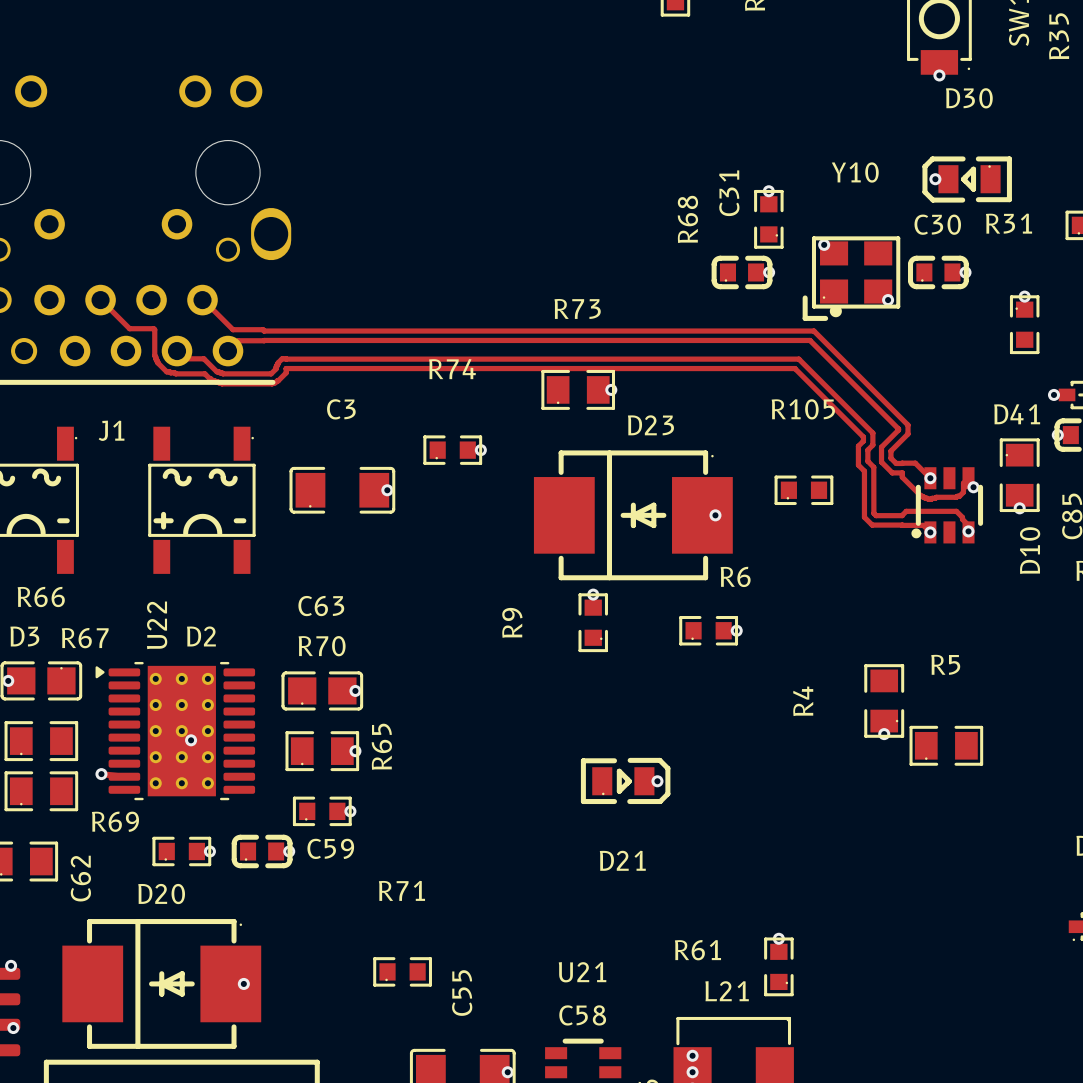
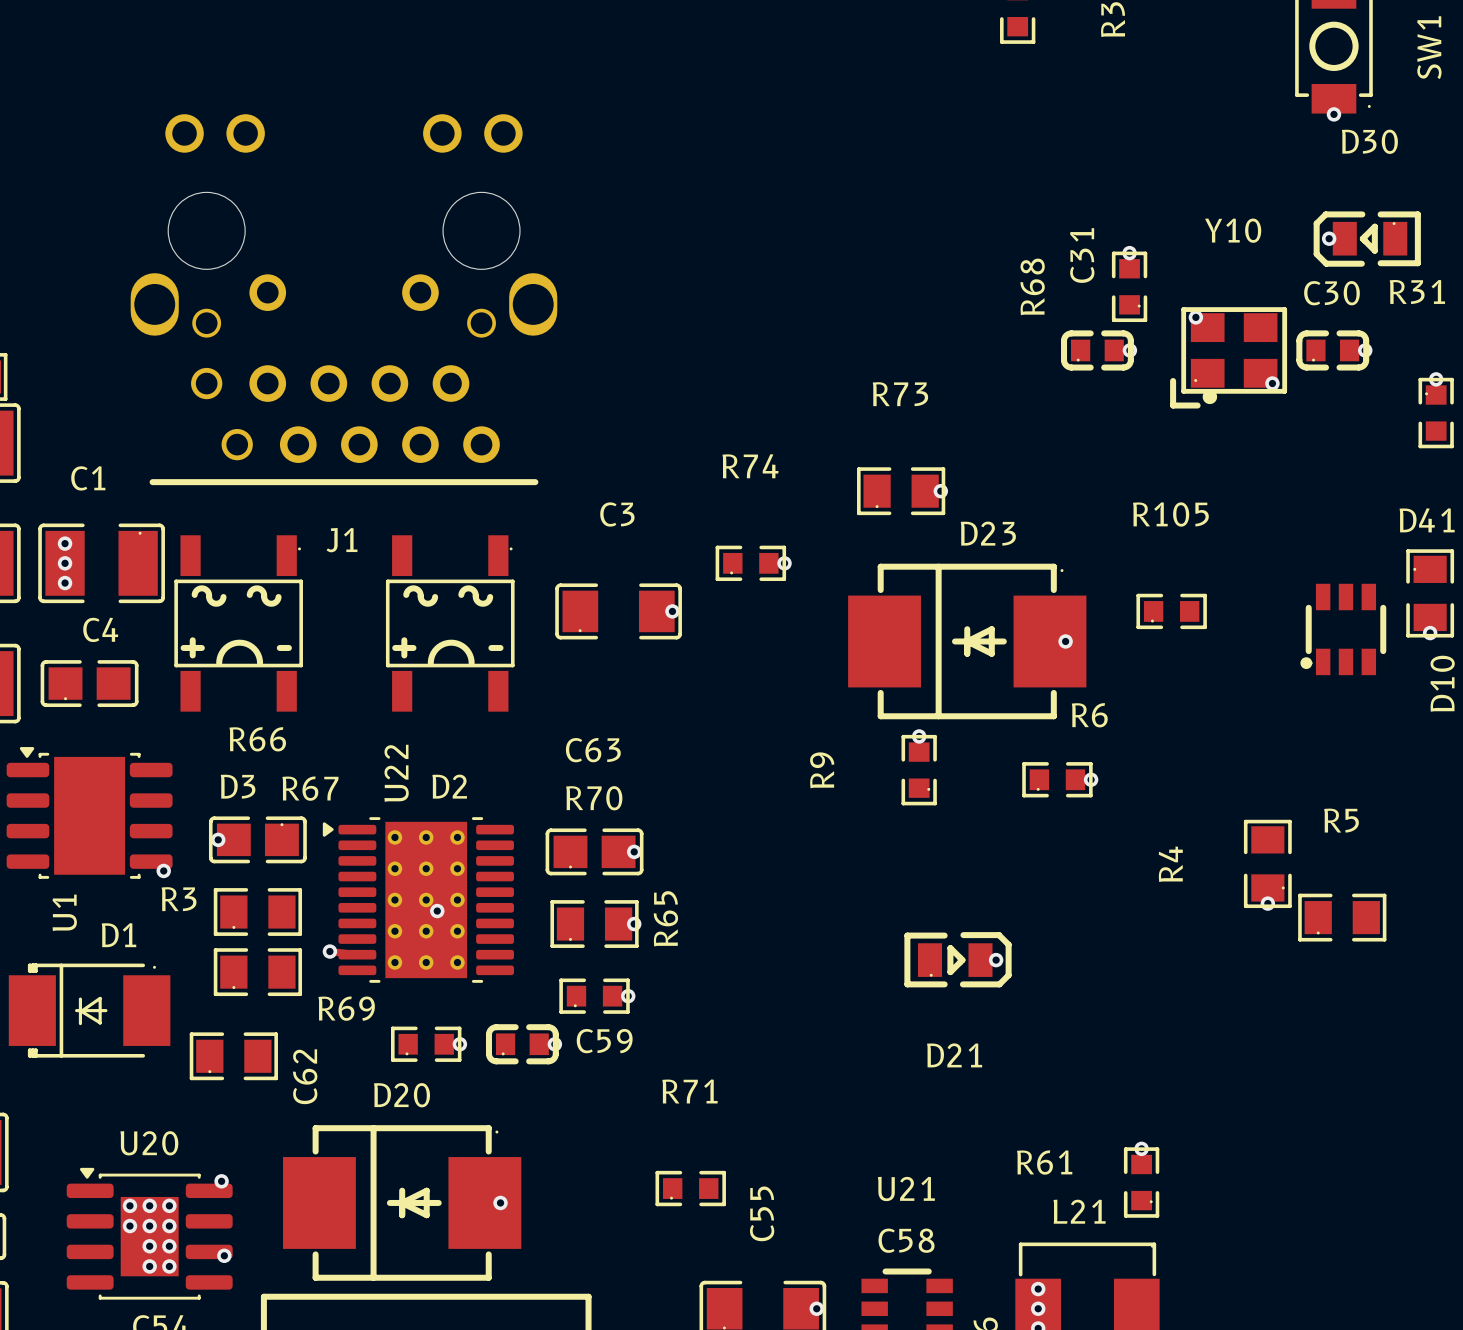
track: (100, 299) (129, 328) (154, 329) (154, 355) (157, 362) (166, 371) (175, 373) (204, 373) (212, 380) (221, 383) (272, 383) (286, 372) (286, 368) (794, 368) (863, 437) (863, 441) (858, 446) (858, 465) (864, 471) (864, 517) (872, 525) (902, 525) -> none
track: (202, 299) (233, 329) (264, 330) -> none
track: (264, 331) (813, 331) (908, 425) (908, 434) (890, 451) (890, 458) (896, 463) (902, 463) -> none
track: (264, 340) (810, 340) (898, 429) (881, 447) (881, 462) (892, 472) (902, 472) (902, 477) (921, 496) (928, 499) (959, 496) (963, 492) (963, 483) (968, 478) (968, 482) (973, 487) (970, 487) -> none
track: (264, 340) (238, 340) (227, 350) -> none
track: (176, 350) (184, 358) (203, 358) (216, 371) (222, 373) (271, 373) (276, 368) (278, 362) (282, 358) (286, 358) -> none
track: (286, 359) (798, 359) (872, 433) (872, 445) (867, 450) (867, 461) (873, 467) (873, 513) (876, 515) (902, 515) -> none
track: (902, 463) (915, 463) (930, 478) -> none
via: (930, 478) -> none
via: (973, 487) -> none
track: (902, 515) (906, 511) (956, 511) (968, 525) (968, 532) -> none
track: (902, 525) (923, 525) (930, 532) -> none
via: (968, 531) -> none
via: (930, 532) -> none

